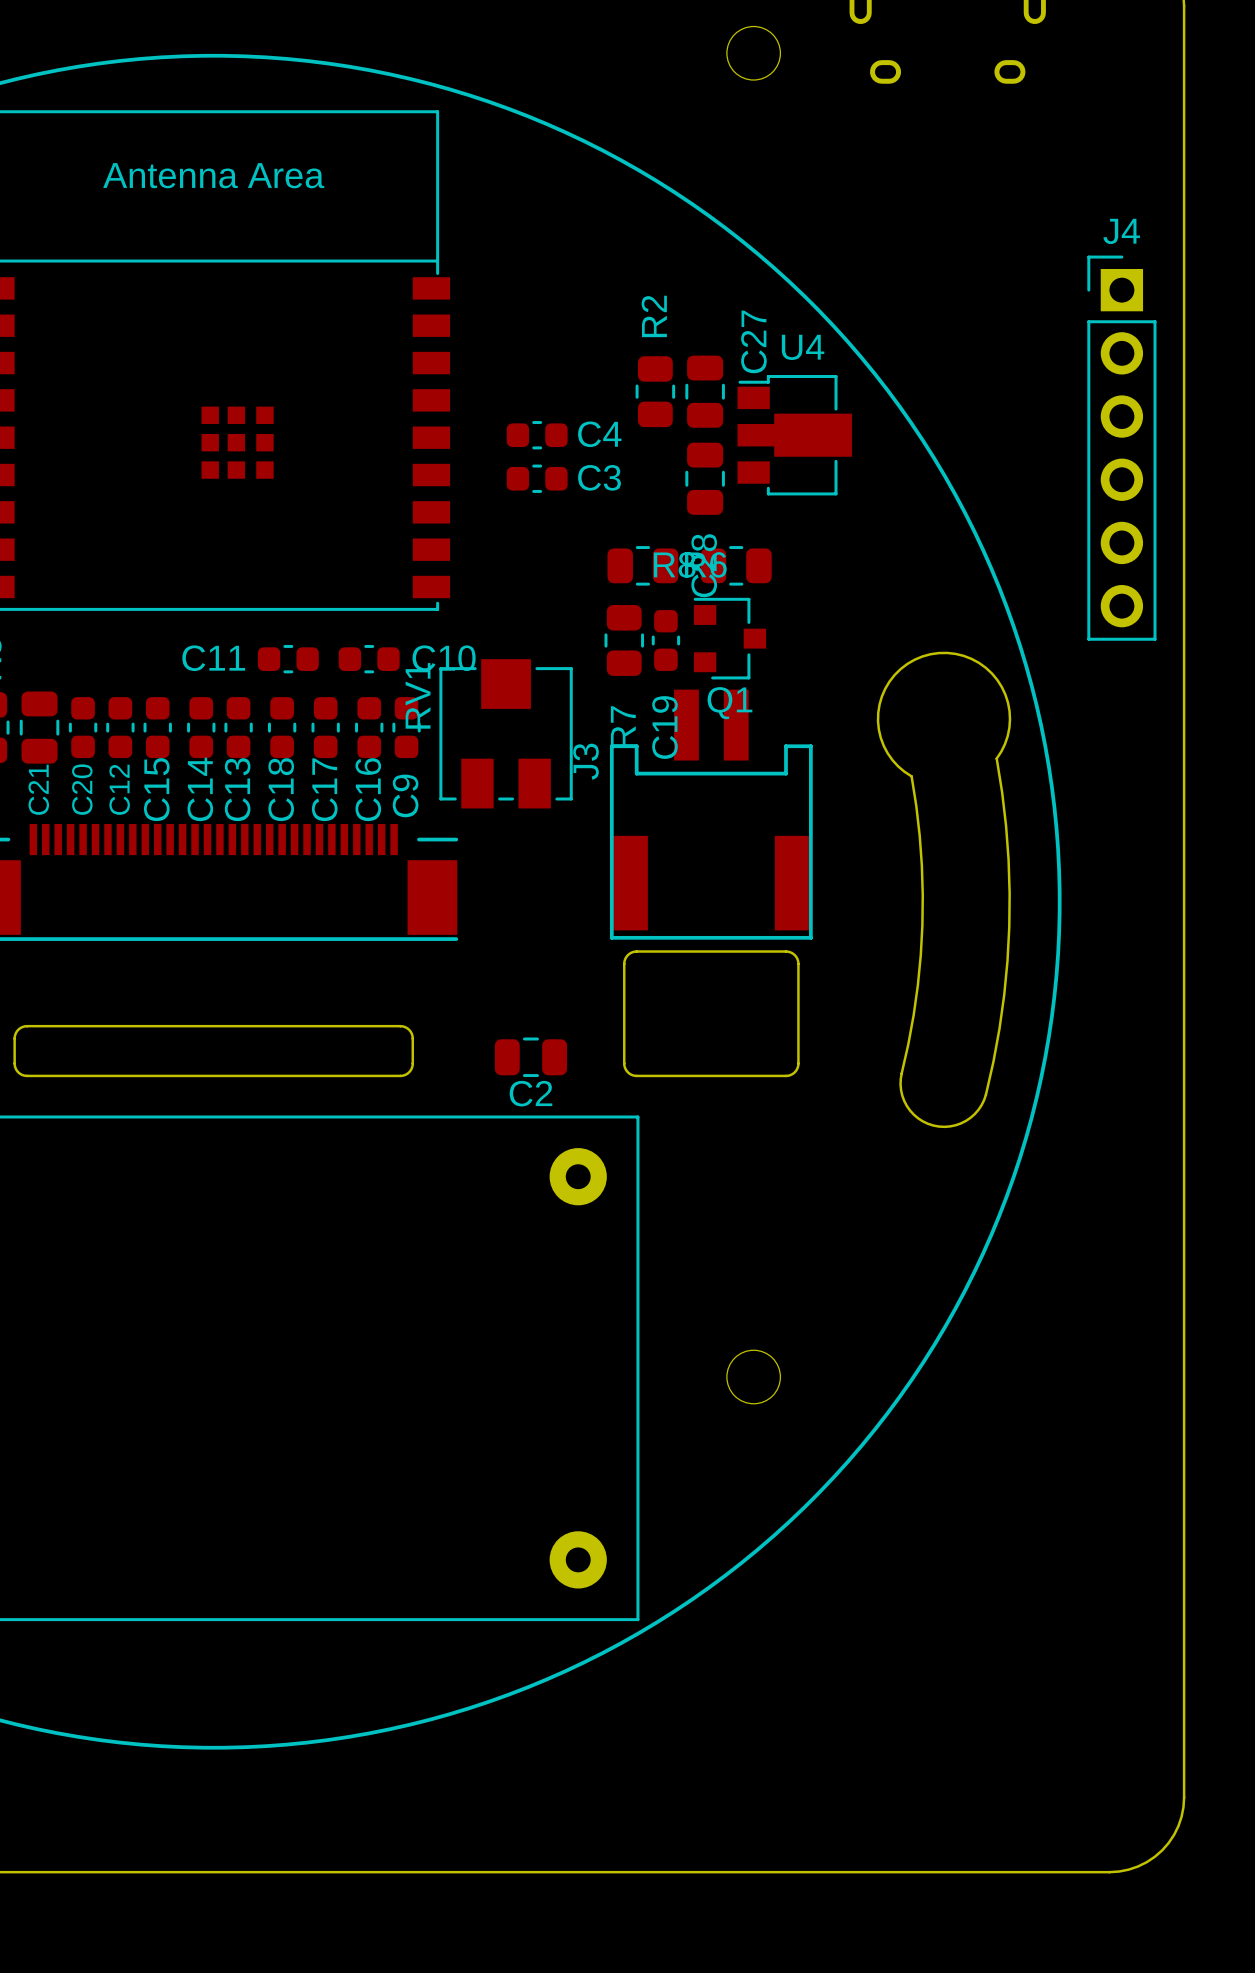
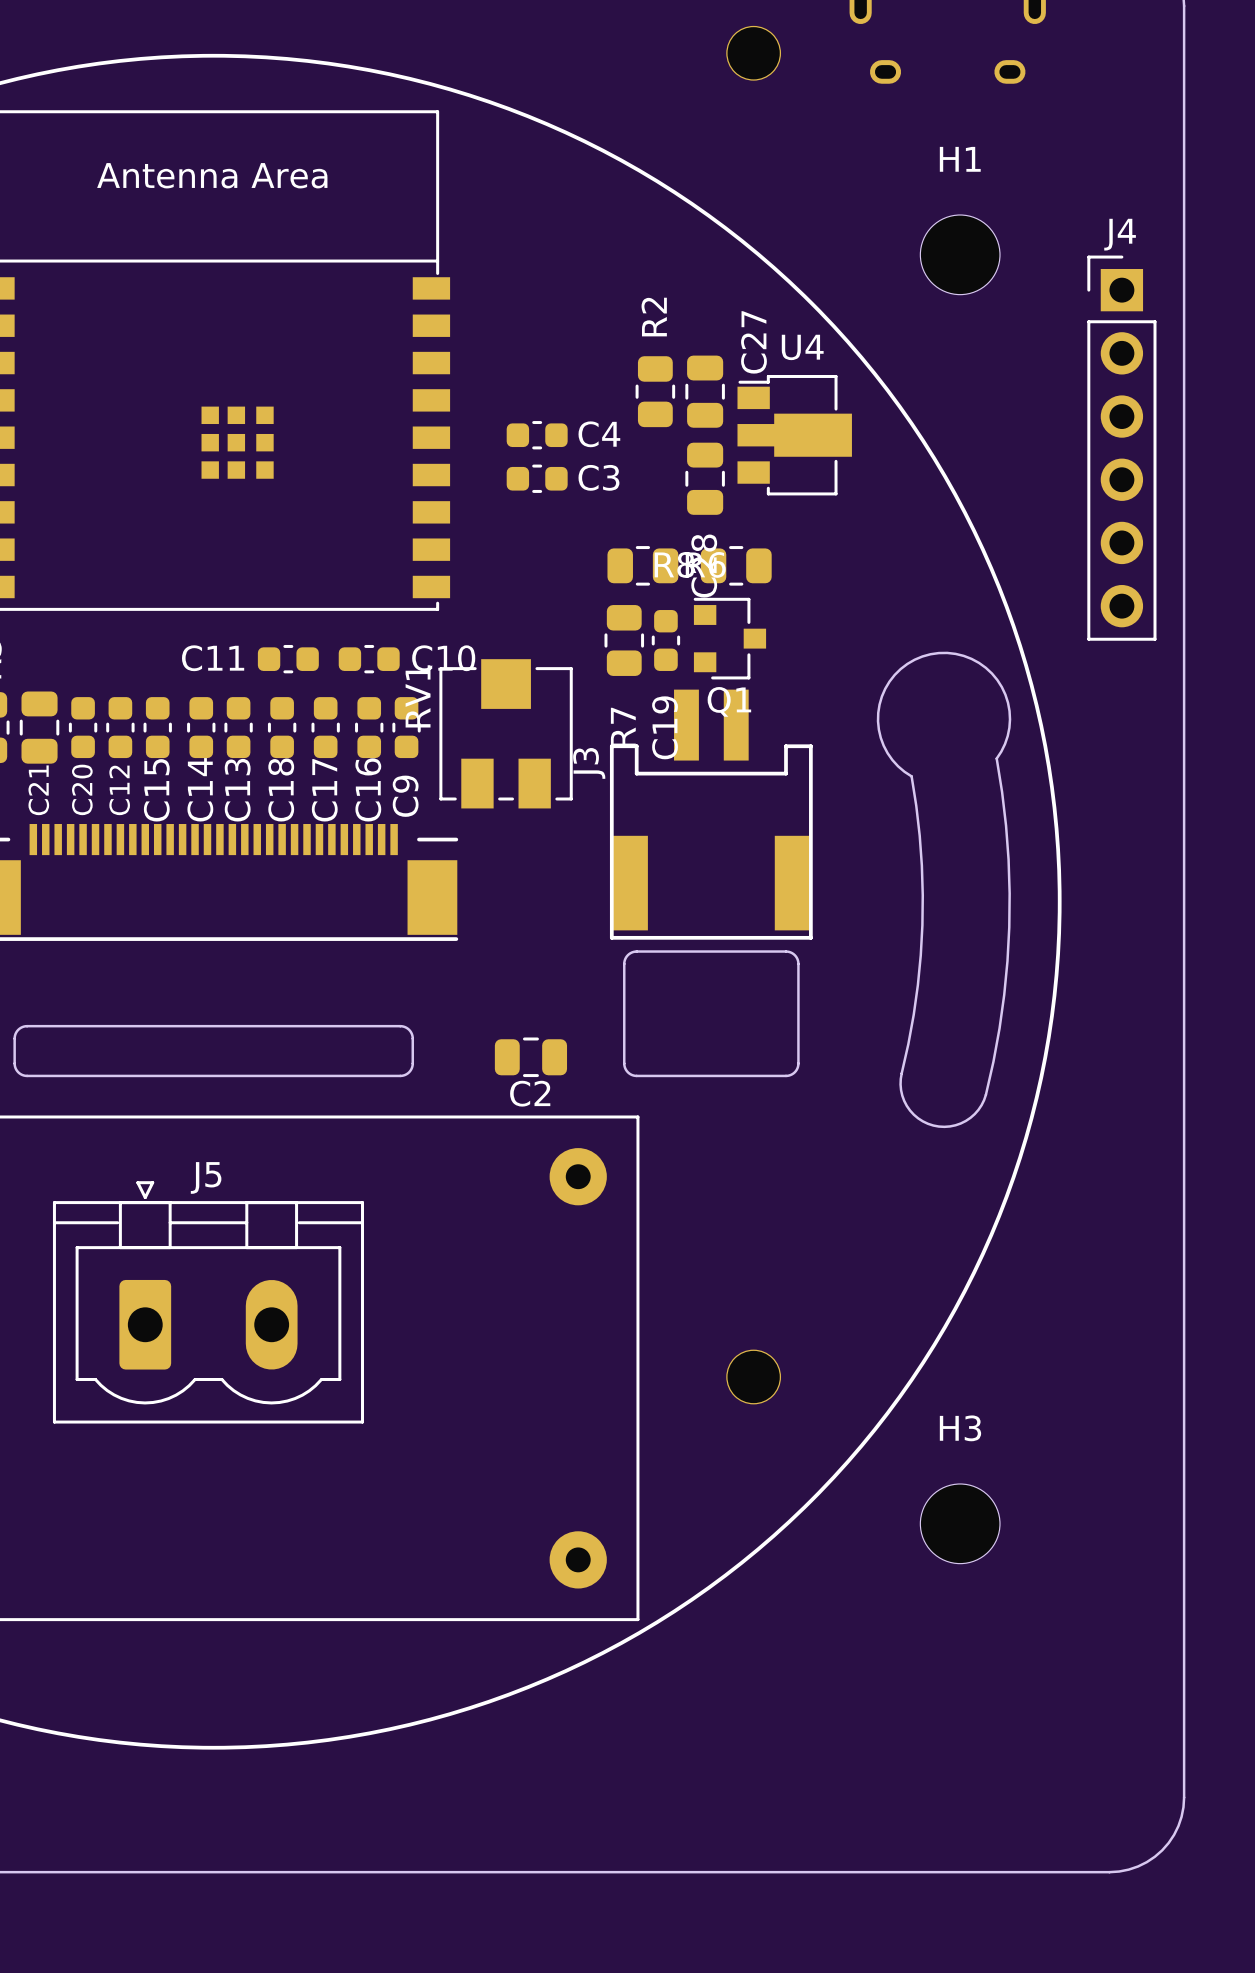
H1: none -> (960, 254)
J5: none -> (208, 1302)
H3: none -> (960, 1523)

